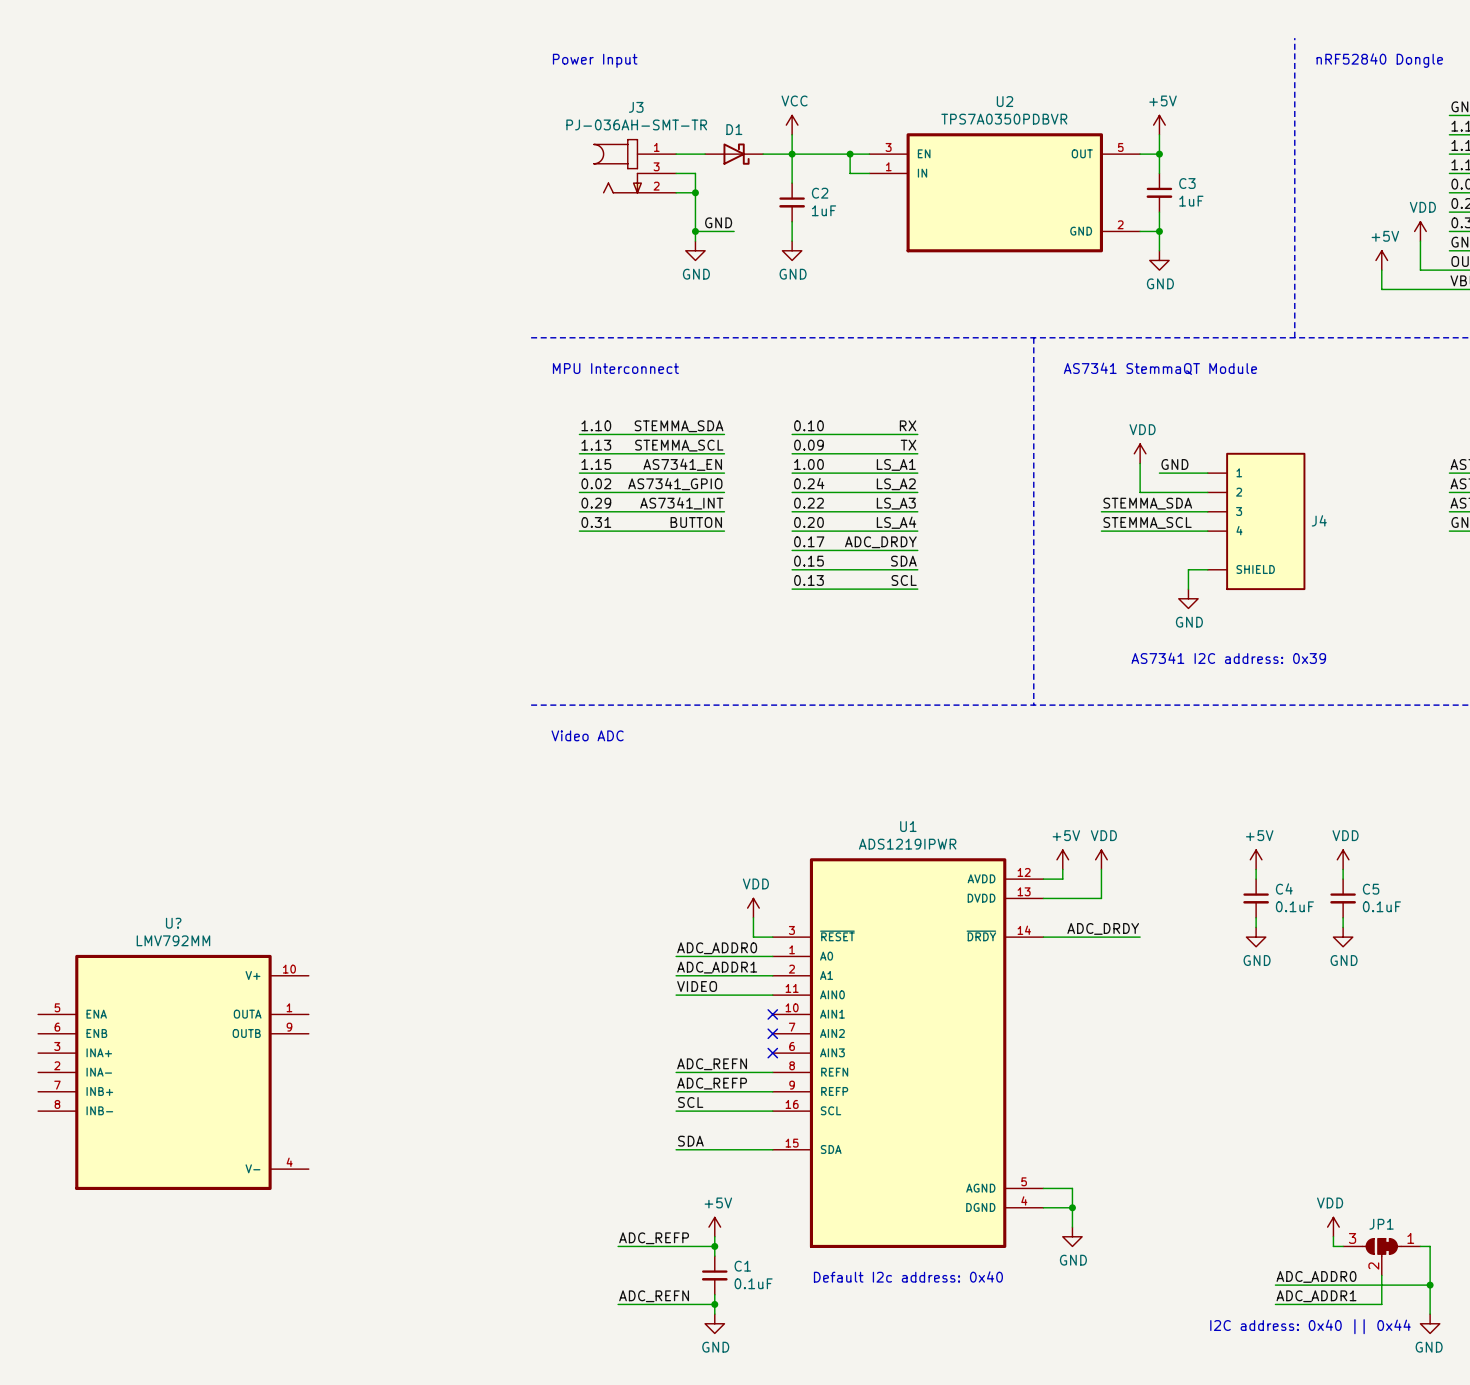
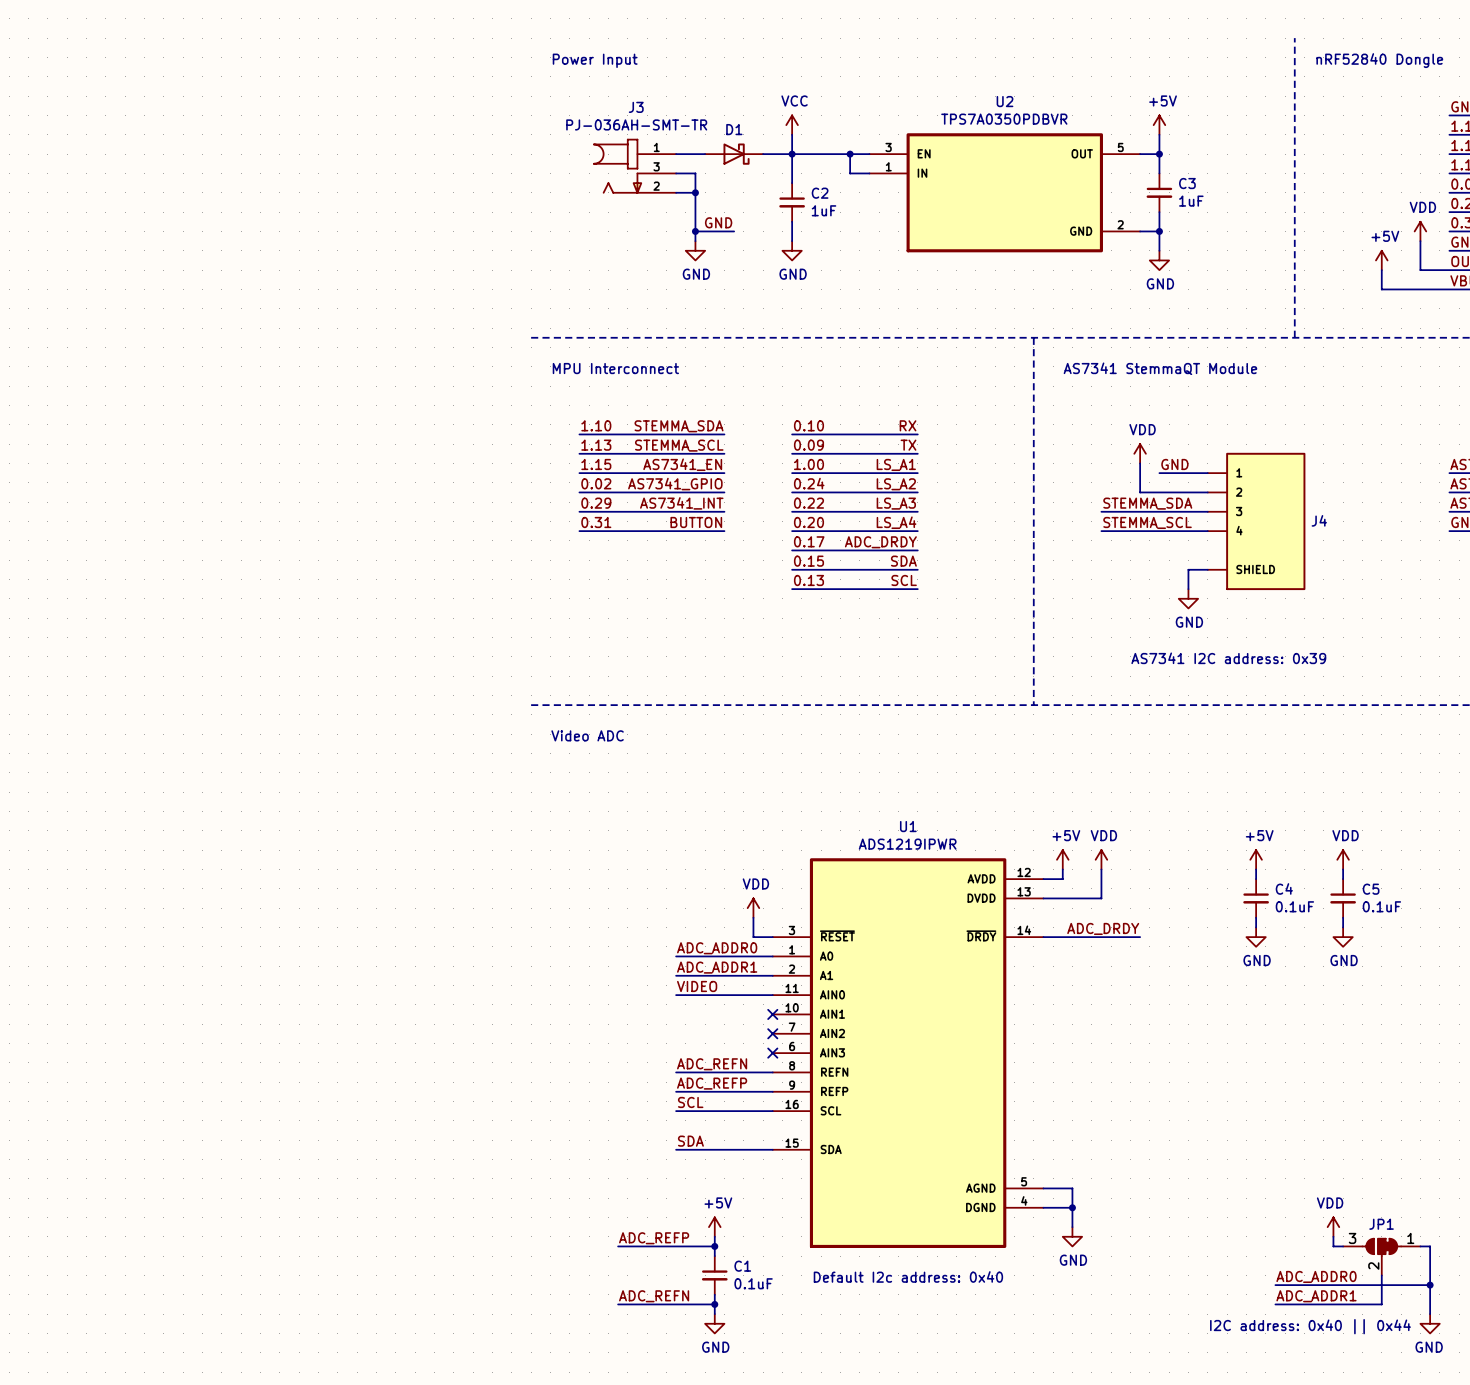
U?: LMV792MM (173, 1072) -> none

